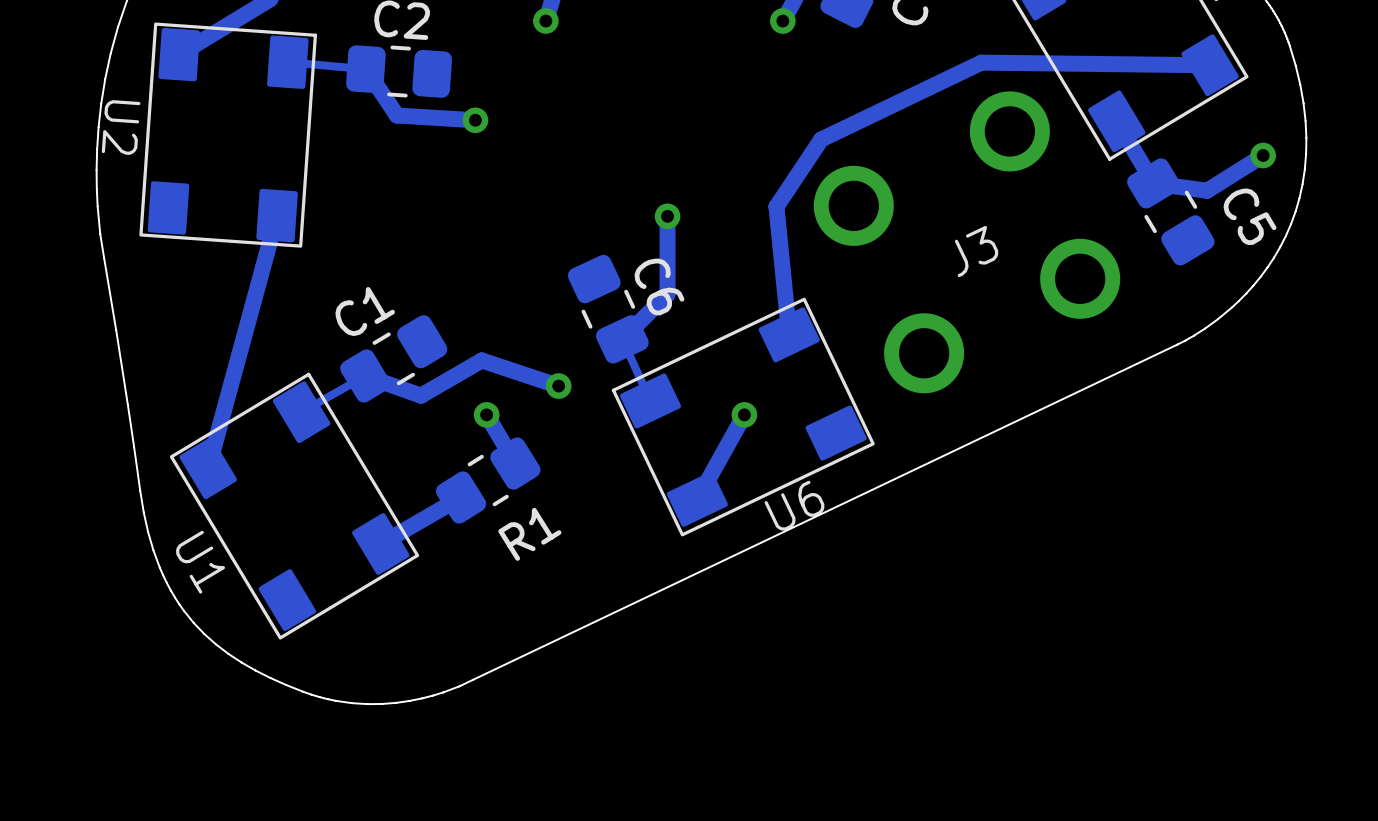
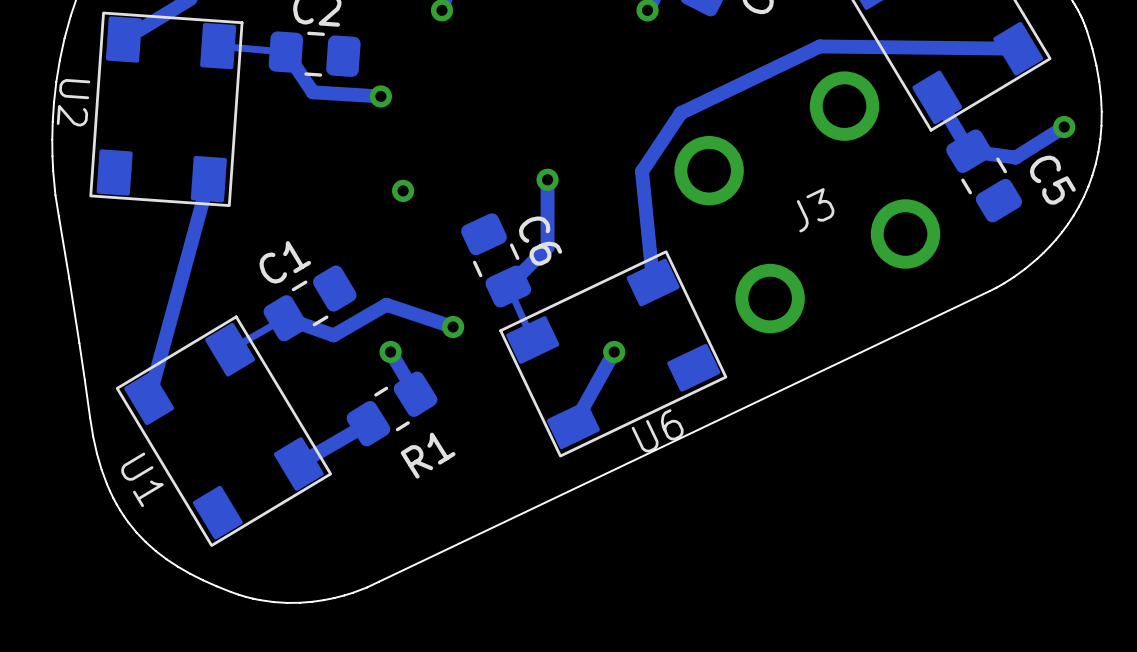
via: none -> (403, 190)

